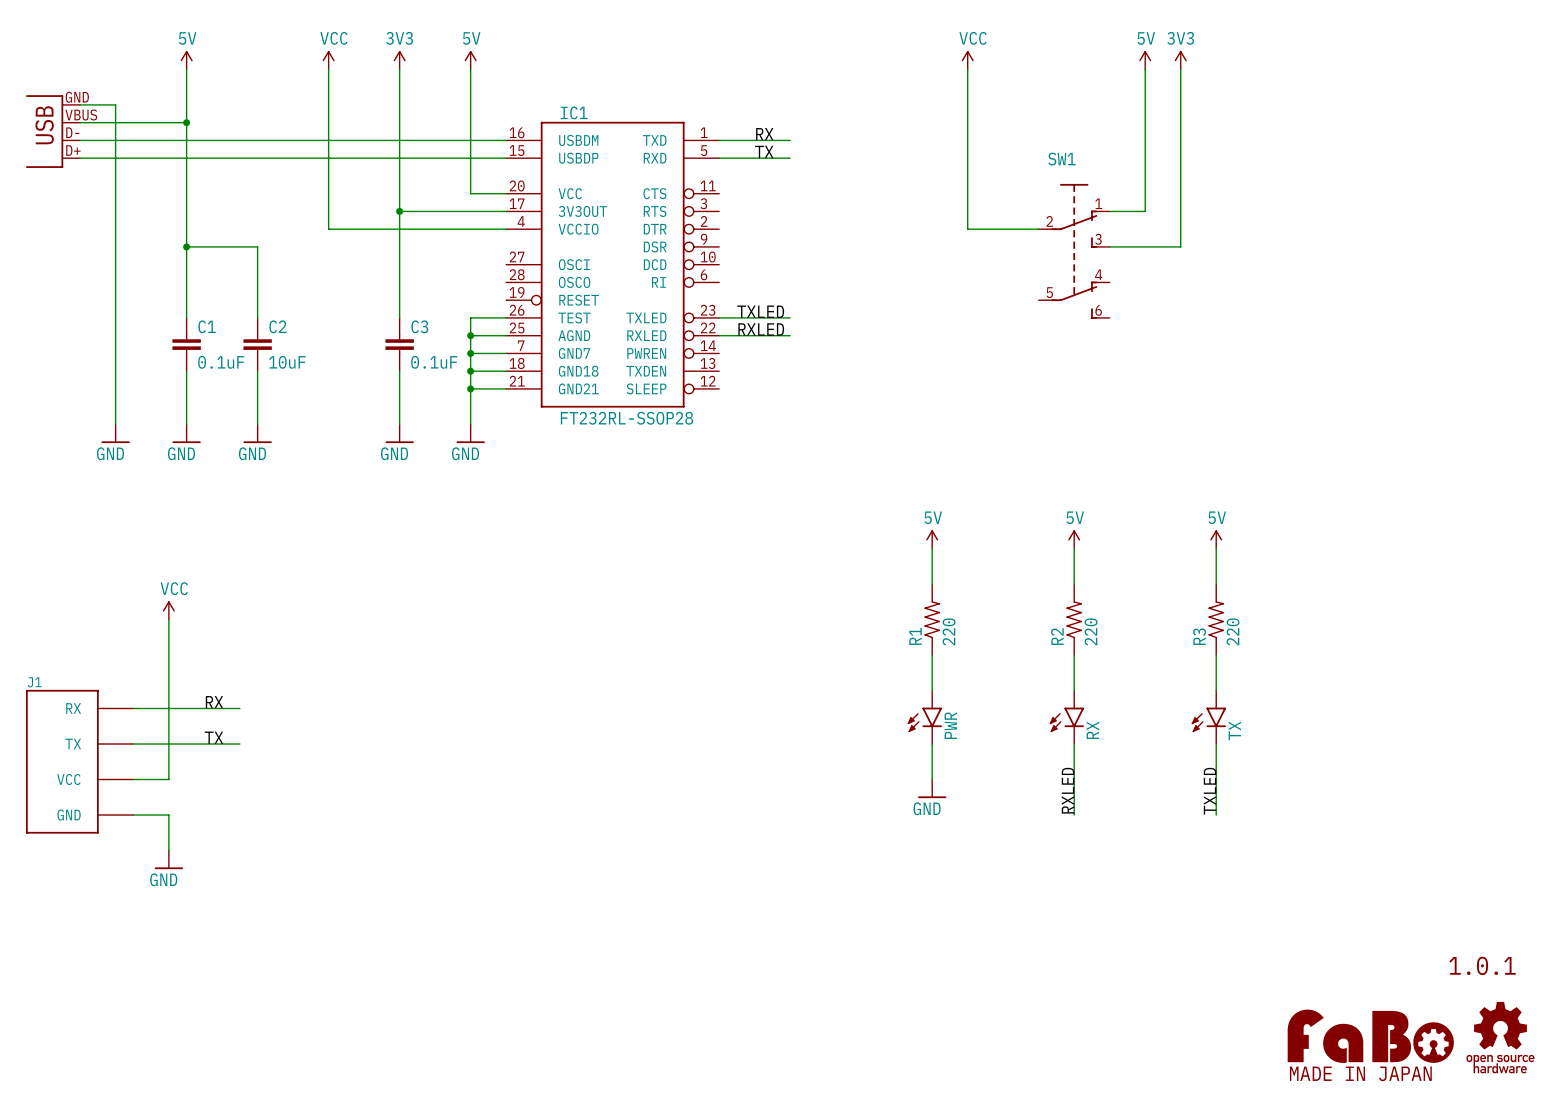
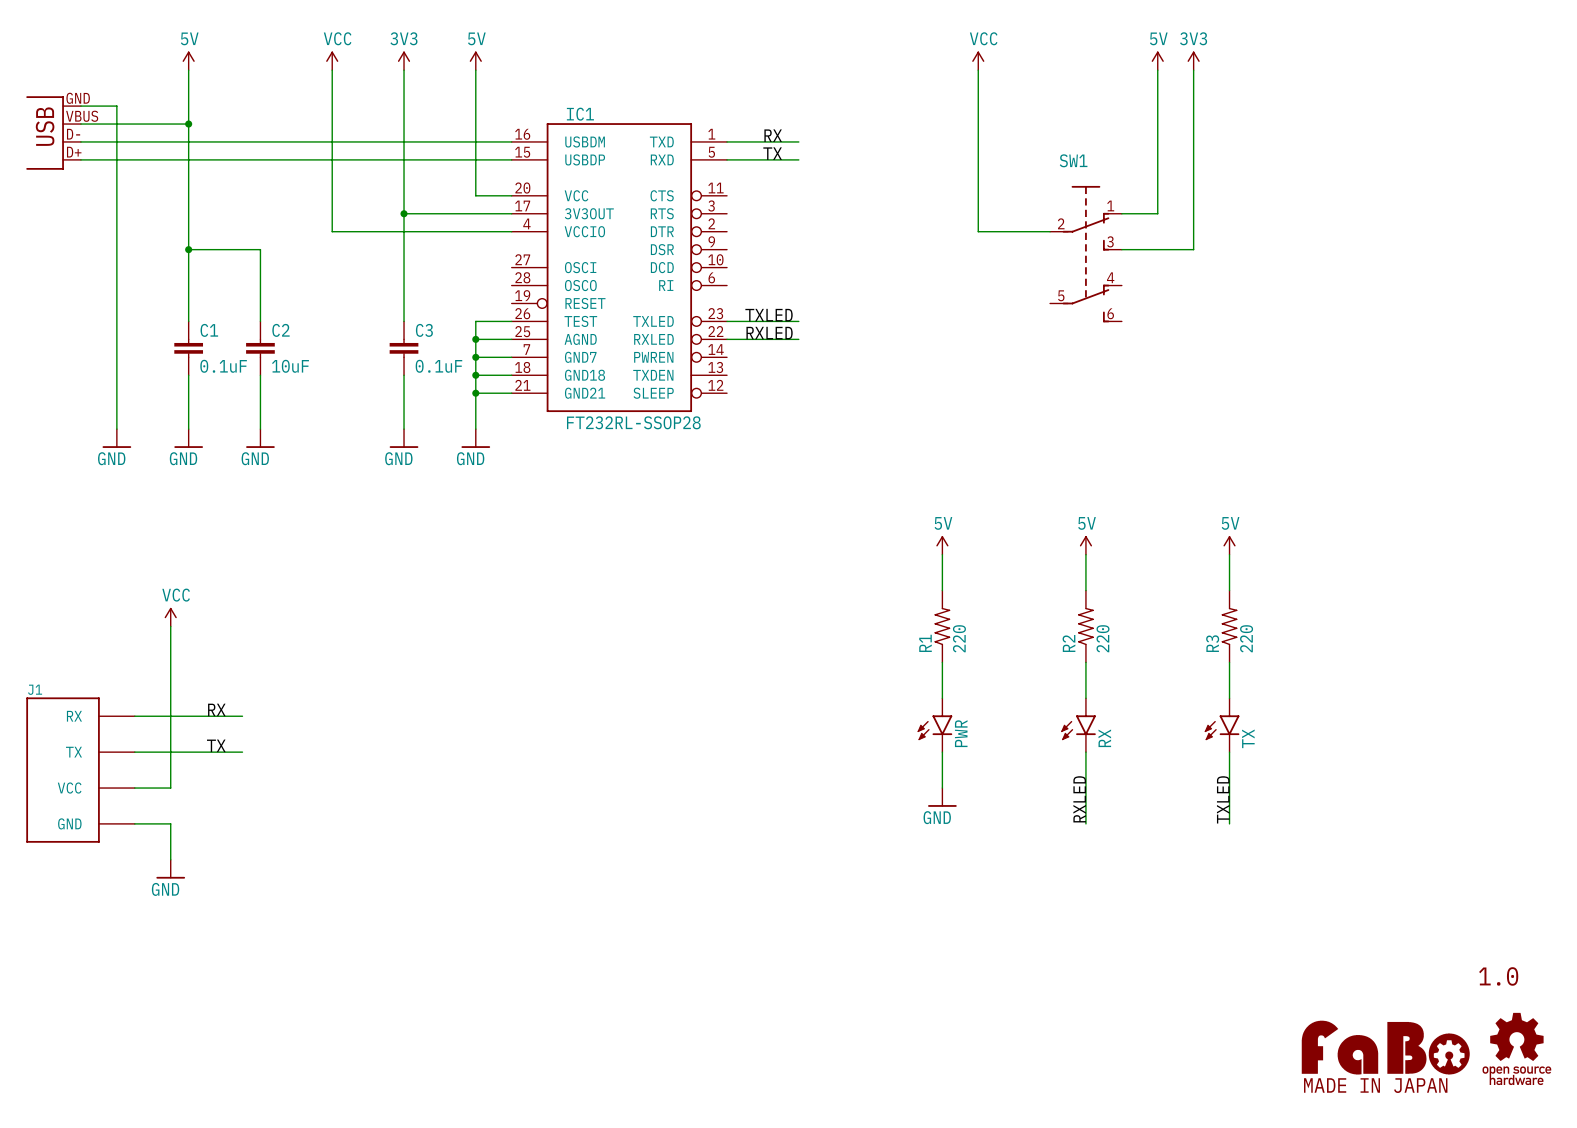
text: 1.0.1 (1482, 965) -> 1.0 (1498, 976)

